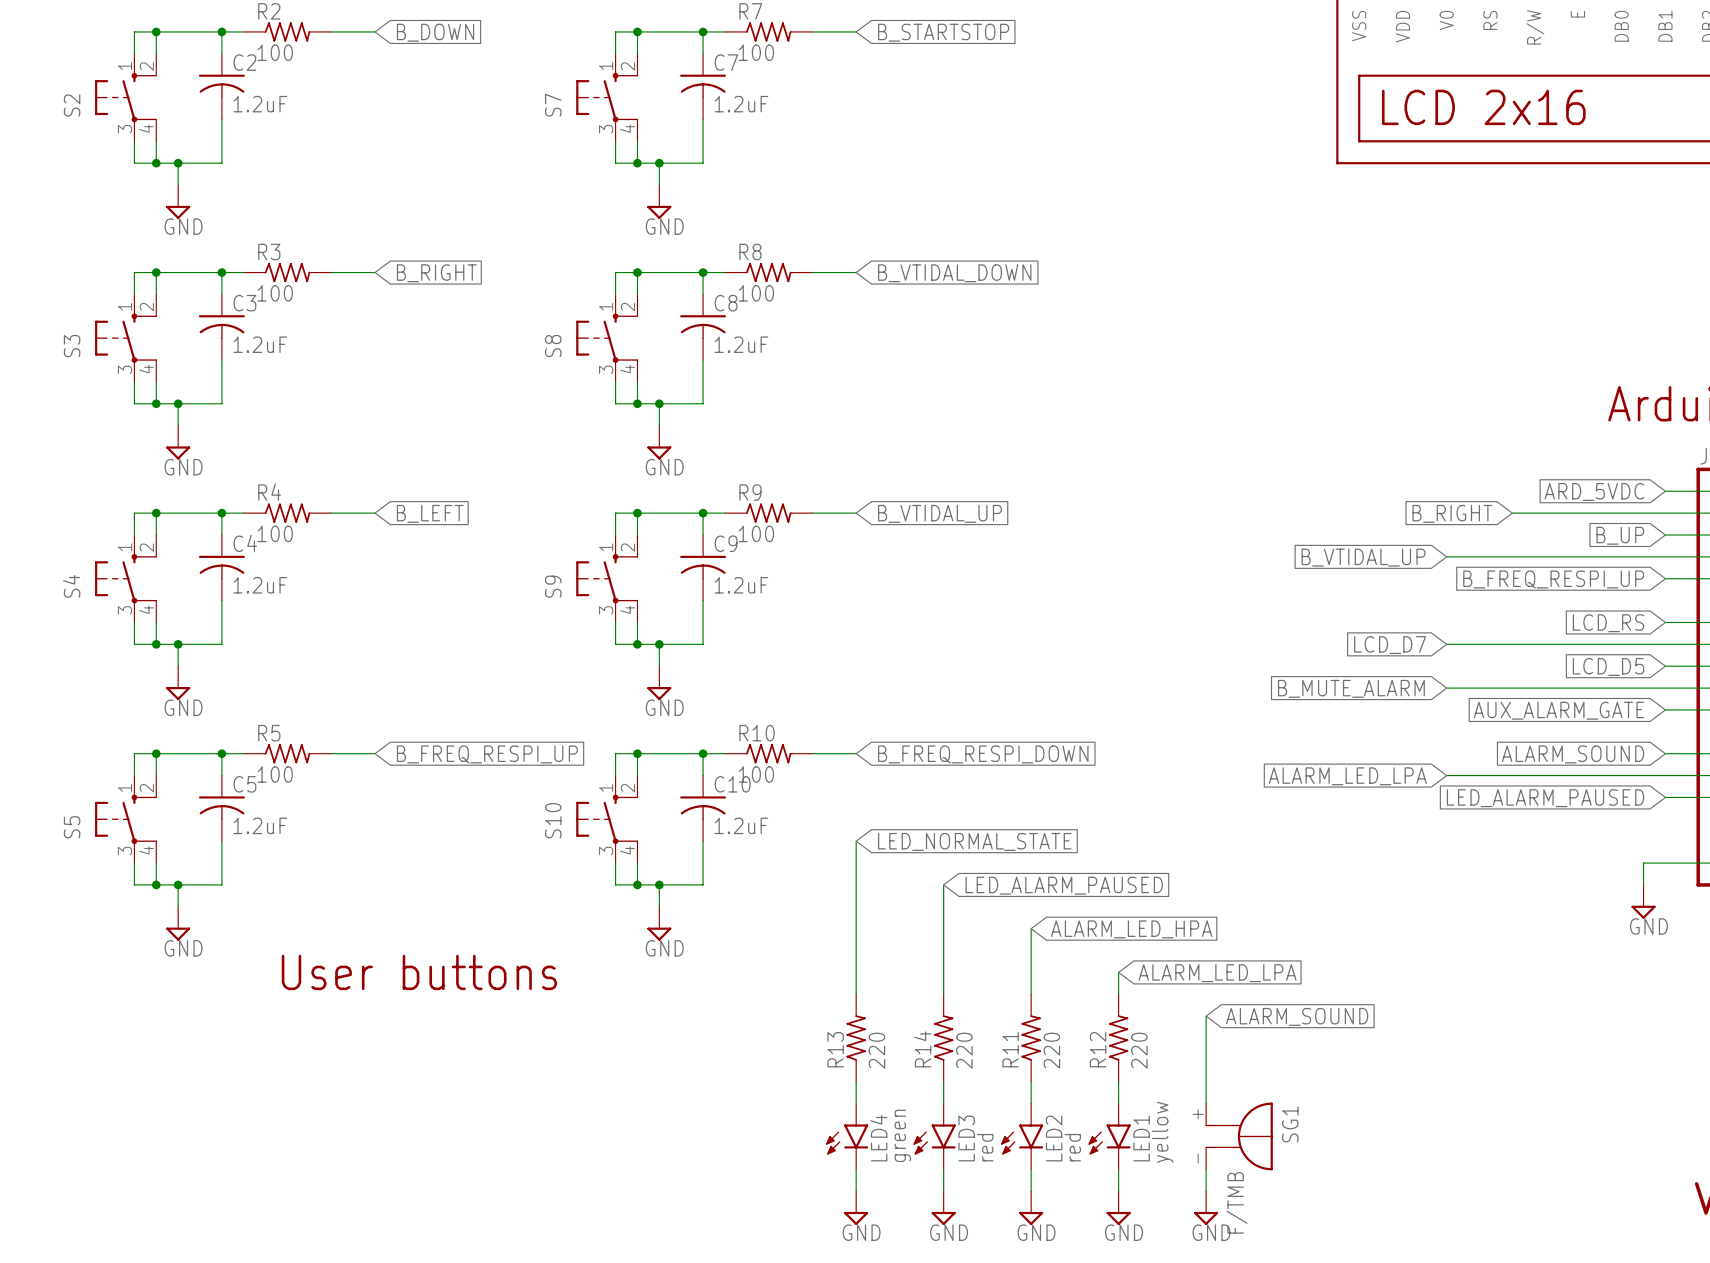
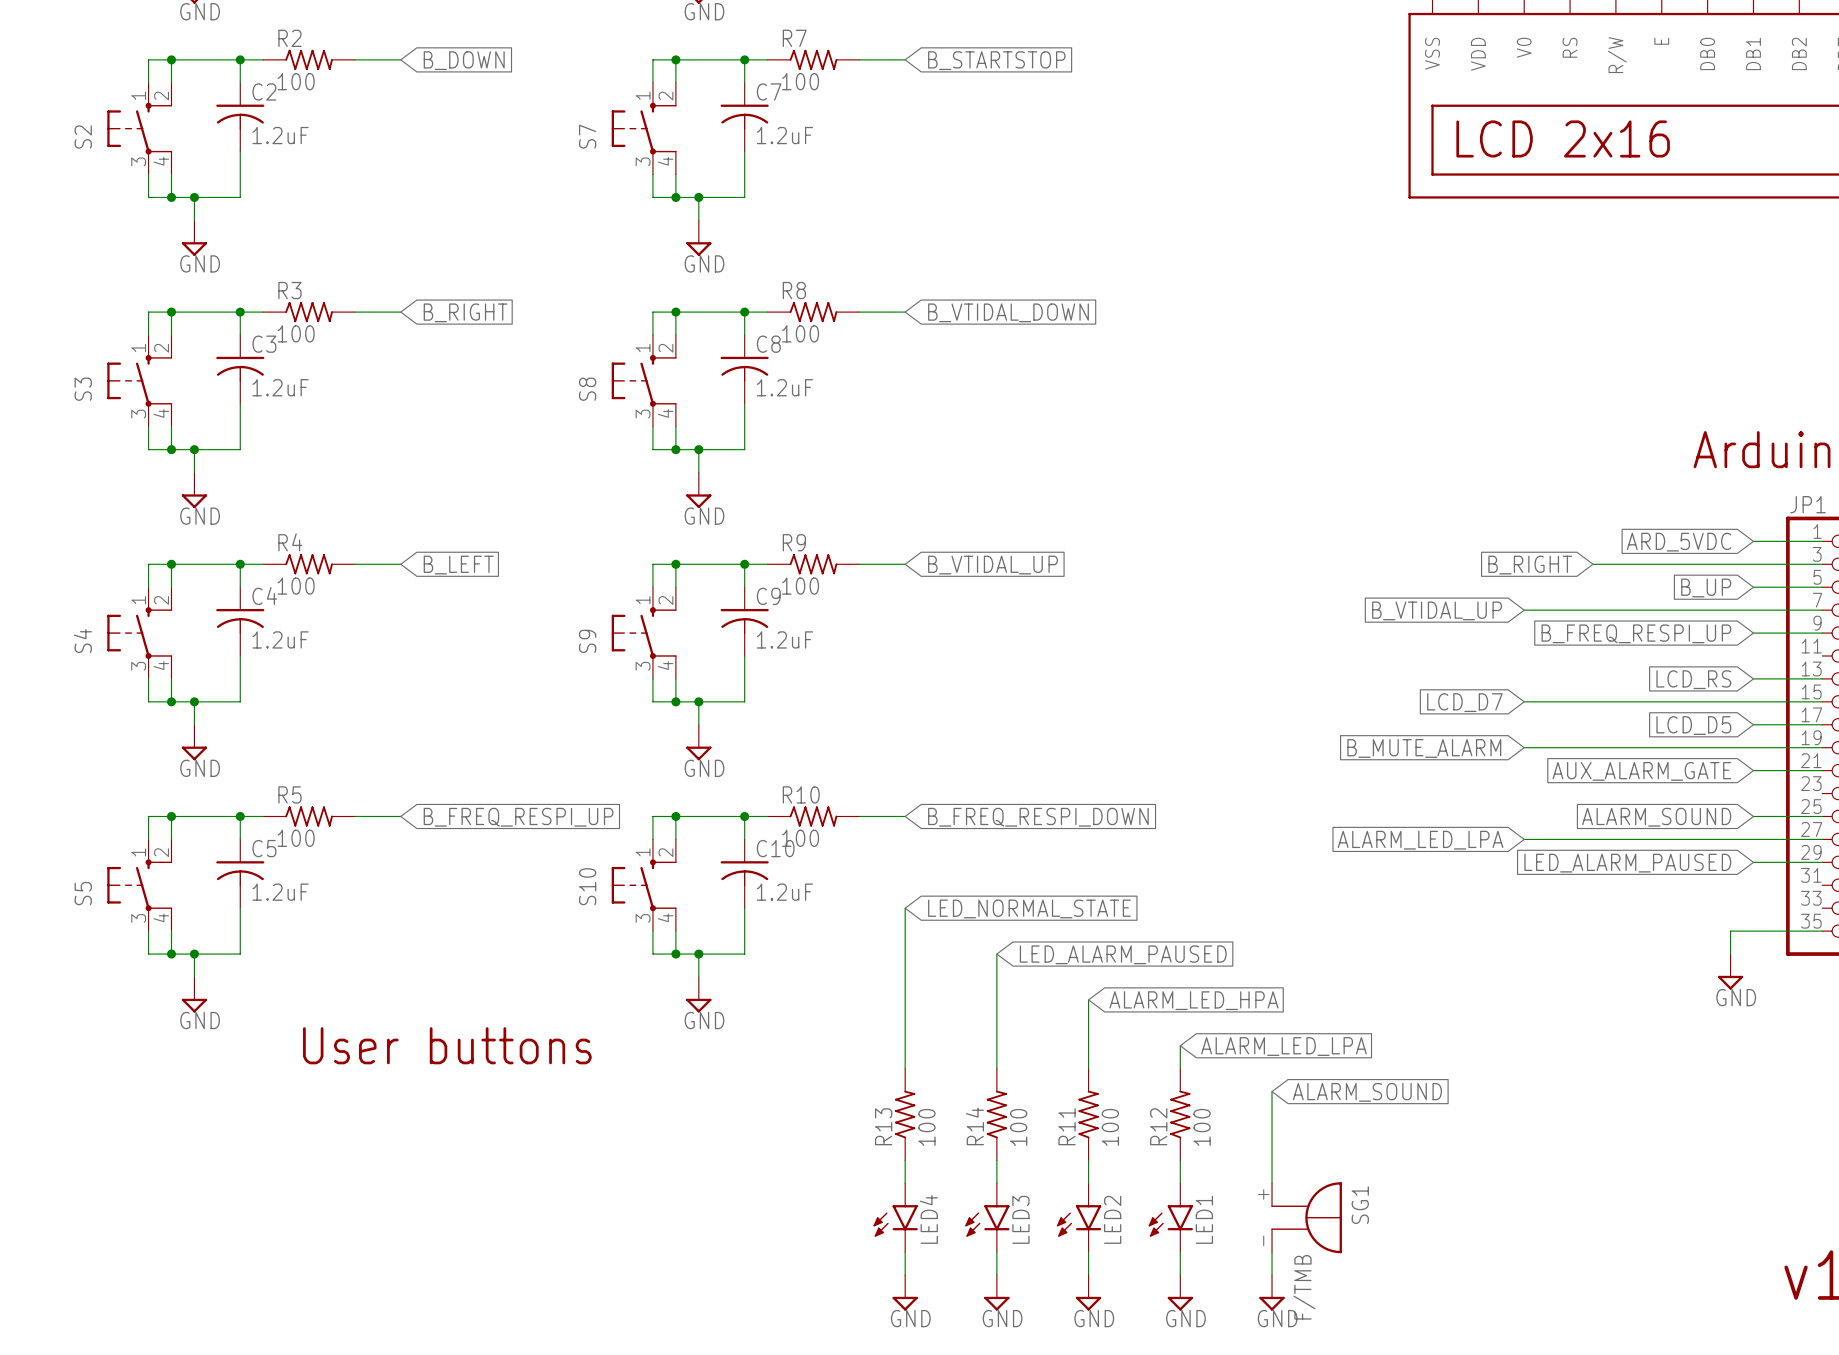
R13 value: 220 (876, 1050) -> 100 (926, 1127)
R14 value: 220 (964, 1050) -> 100 (1018, 1127)
R11 value: 220 (1051, 1050) -> 100 (1110, 1127)
R12 value: 220 (1139, 1050) -> 100 (1202, 1127)
LED1 value: yellow (1162, 1132) -> none
LED4 value: green (902, 1135) -> none
LED3 value: red (985, 1147) -> none
LED2 value: red (1072, 1147) -> none

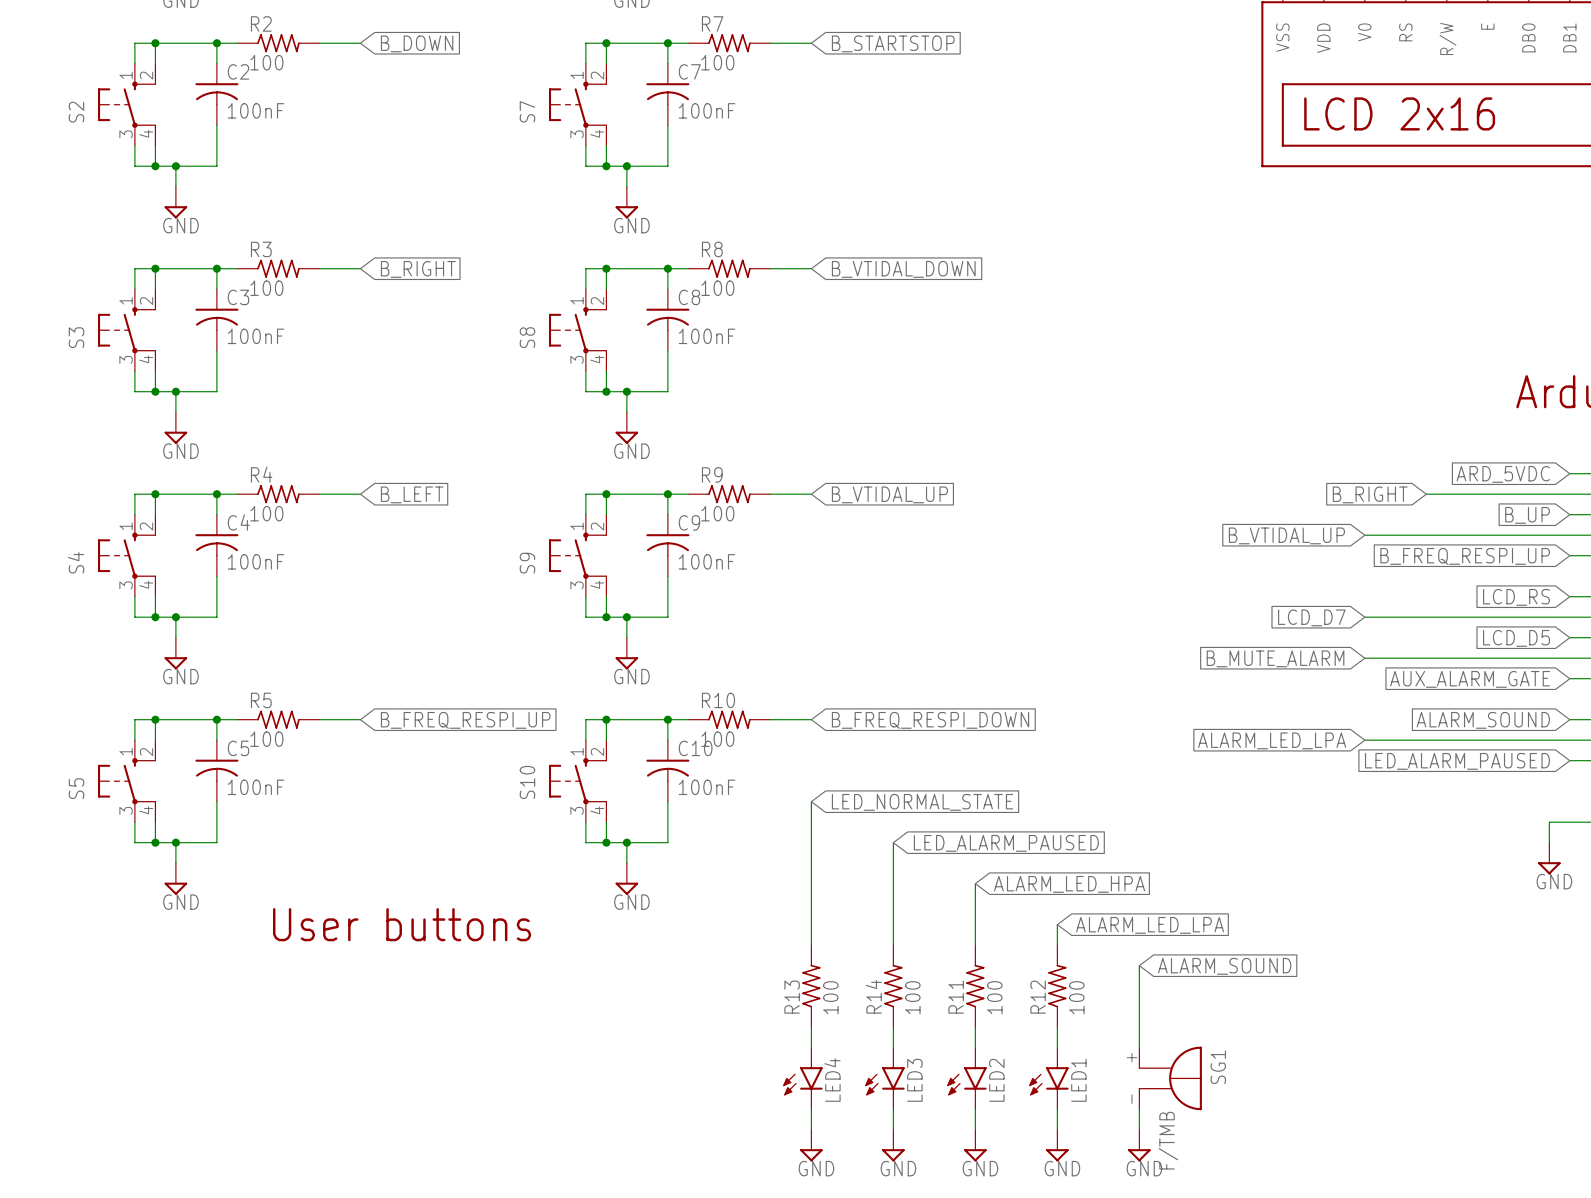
C2 value: 1.2uF (280, 135) -> 100nF (255, 110)
C7 value: 1.2uF (784, 135) -> 100nF (706, 110)
C3 value: 1.2uF (280, 387) -> 100nF (255, 336)
C8 value: 1.2uF (784, 387) -> 100nF (706, 336)
C4 value: 1.2uF (280, 639) -> 100nF (255, 561)
C9 value: 1.2uF (784, 639) -> 100nF (706, 561)
C5 value: 1.2uF (280, 892) -> 100nF (255, 787)
C10 value: 1.2uF (784, 892) -> 100nF (706, 787)

